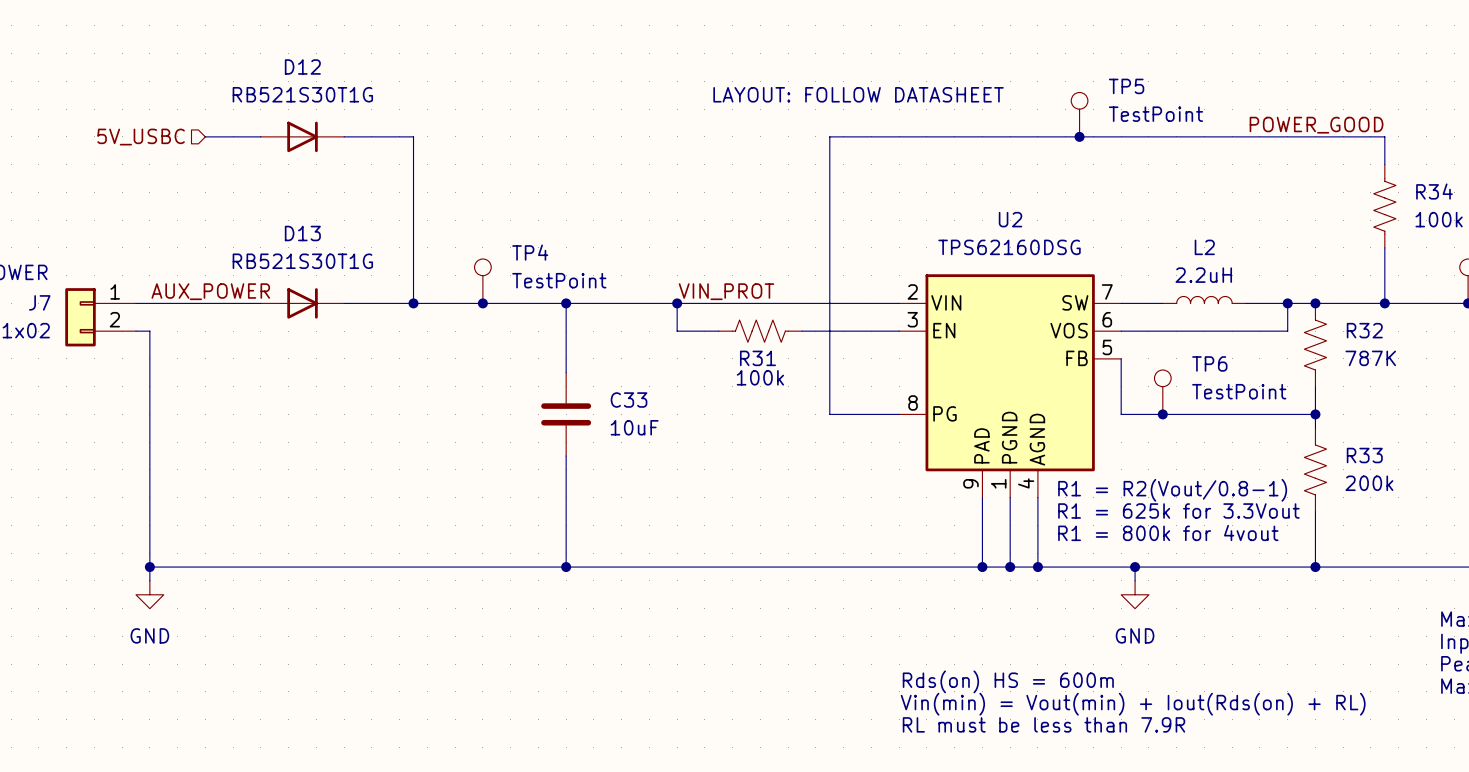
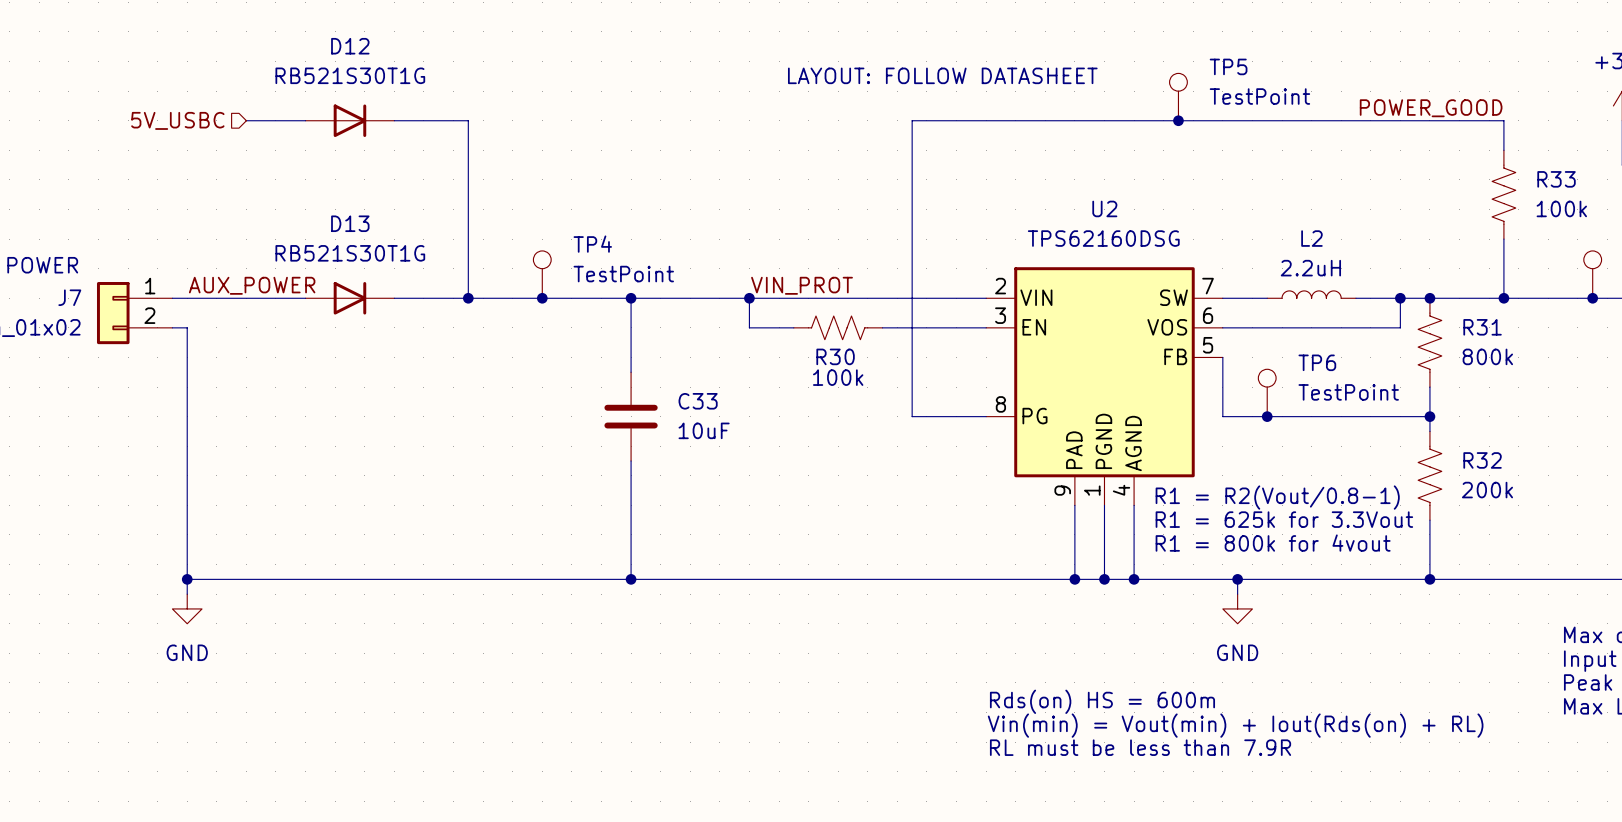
R34 name: R34 (1434, 191) -> R33 (1556, 179)
R32 name: R32 (1364, 330) -> R31 (1482, 327)
R31 name: R31 (757, 358) -> R30 (835, 356)
R32 value: 787K (1370, 358) -> 800k (1487, 356)
R33 name: R33 (1364, 455) -> R32 (1482, 460)

